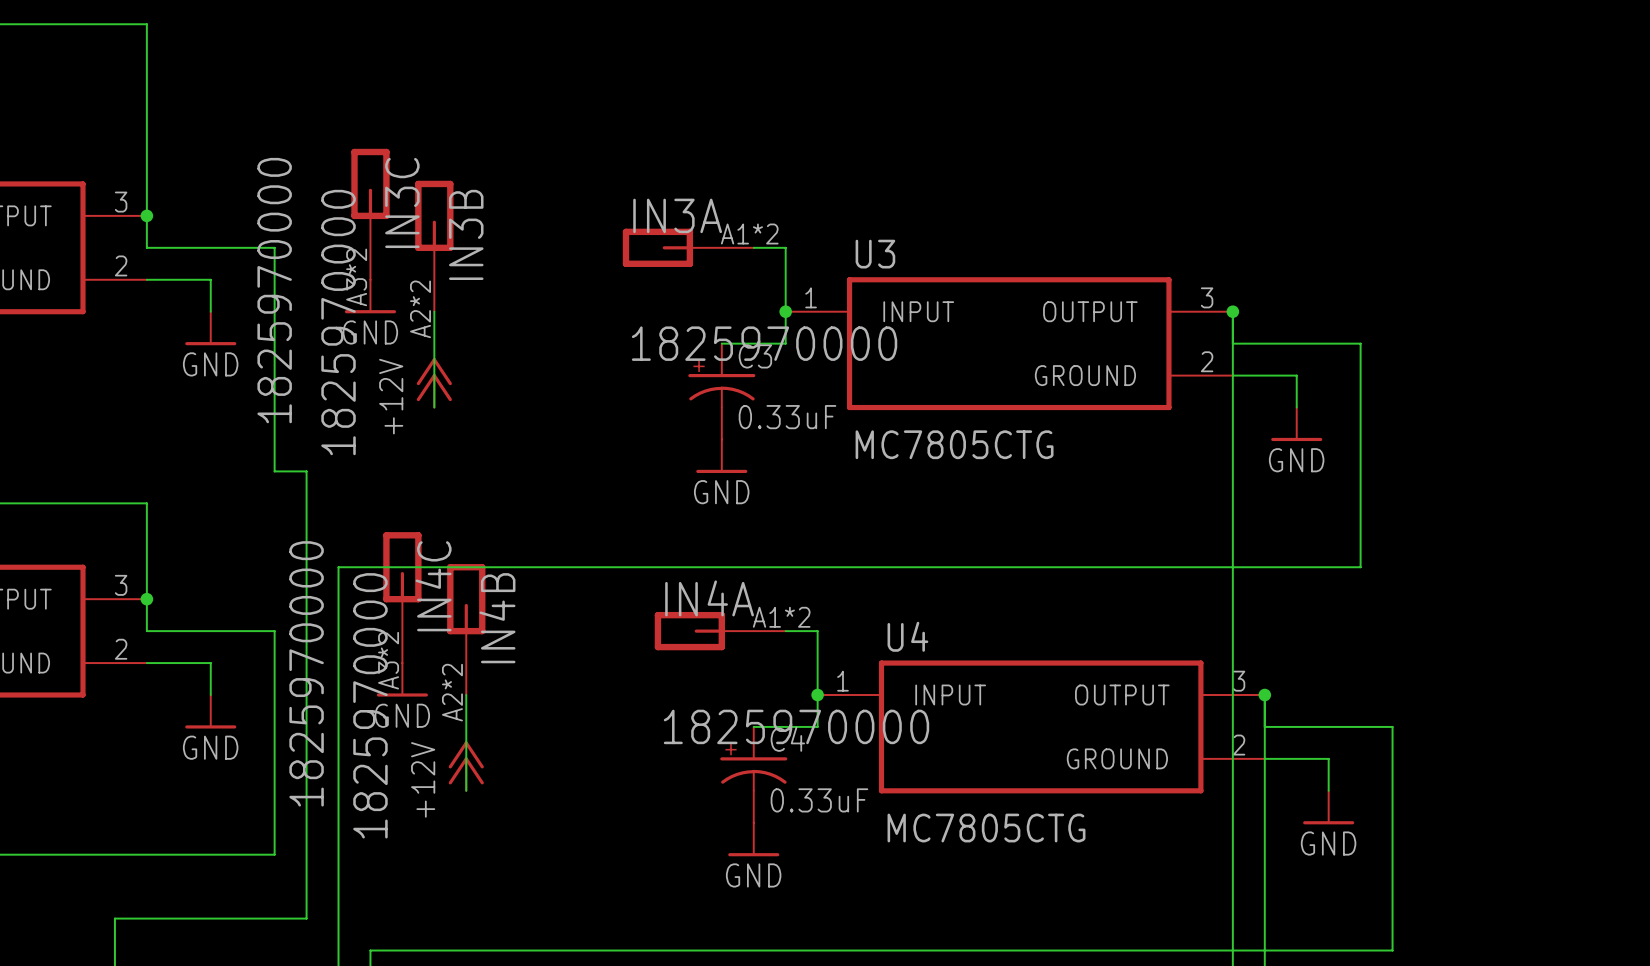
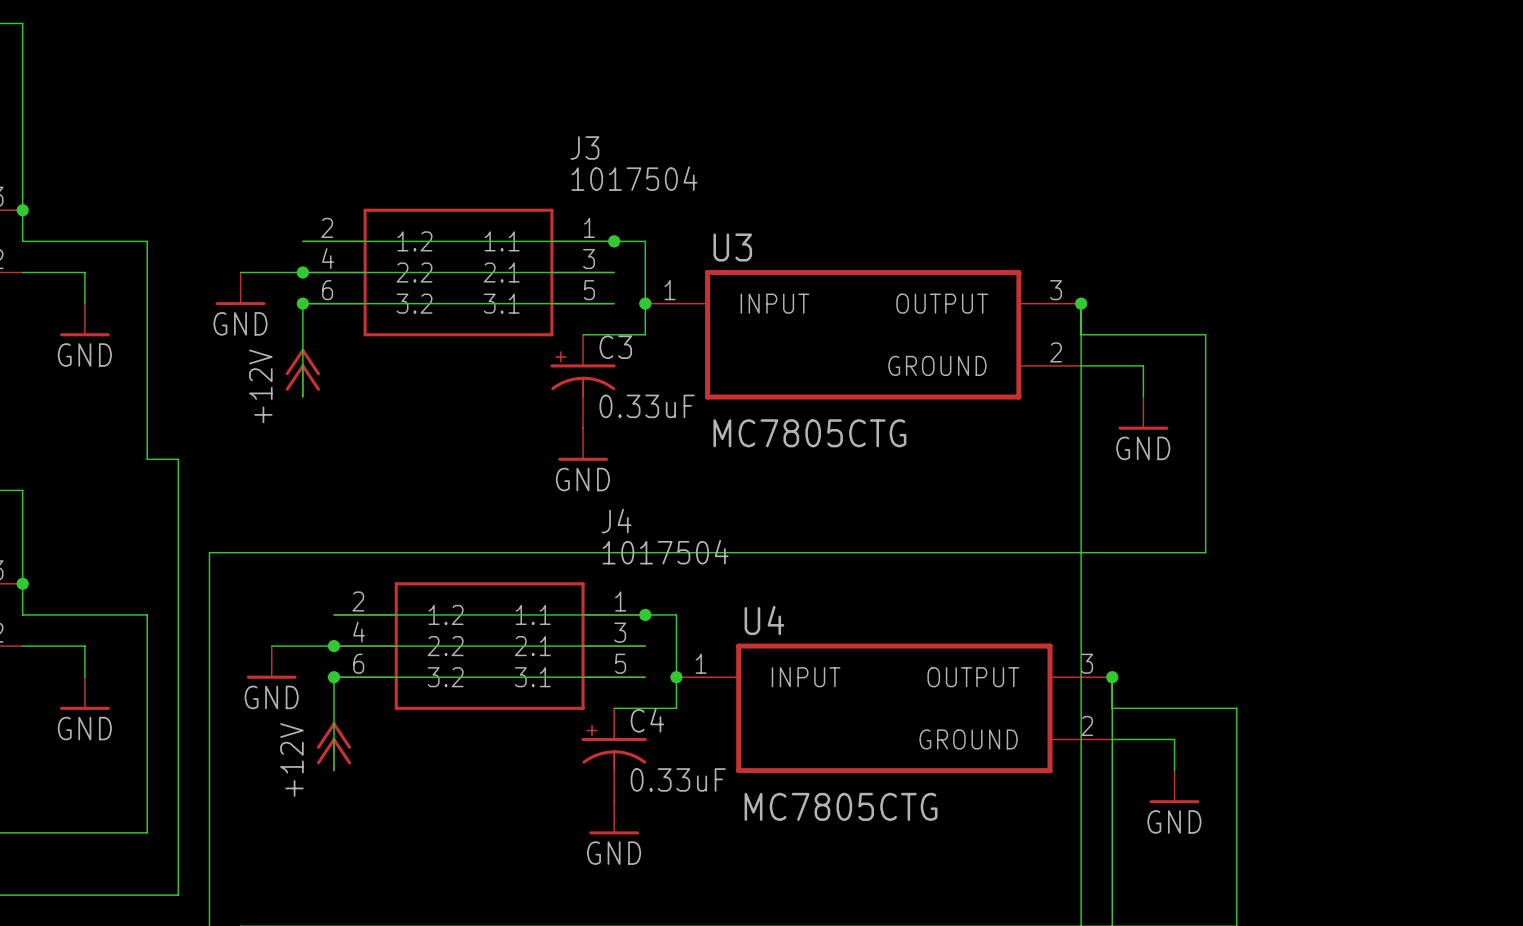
IN3C: (370, 214) -> none
IN3B: (434, 246) -> none
wire: none -> (302, 241) (614, 241)
IN3A: (688, 247) -> none
junction: none -> (614, 241)
wire: none -> (240, 272) (614, 272)
junction: none -> (302, 272)
J3: none -> 1017504 (458, 272)
wire: none -> (302, 303) (614, 303)
junction: none -> (302, 303)
IN4C: (402, 597) -> none
IN4B: (466, 629) -> none
wire: none -> (333, 614) (645, 614)
IN4A: (720, 631) -> none
junction: none -> (645, 614)
wire: none -> (271, 646) (645, 646)
junction: none -> (333, 646)
J4: none -> 1017504 (489, 646)
wire: none -> (333, 677) (645, 677)
junction: none -> (333, 677)

